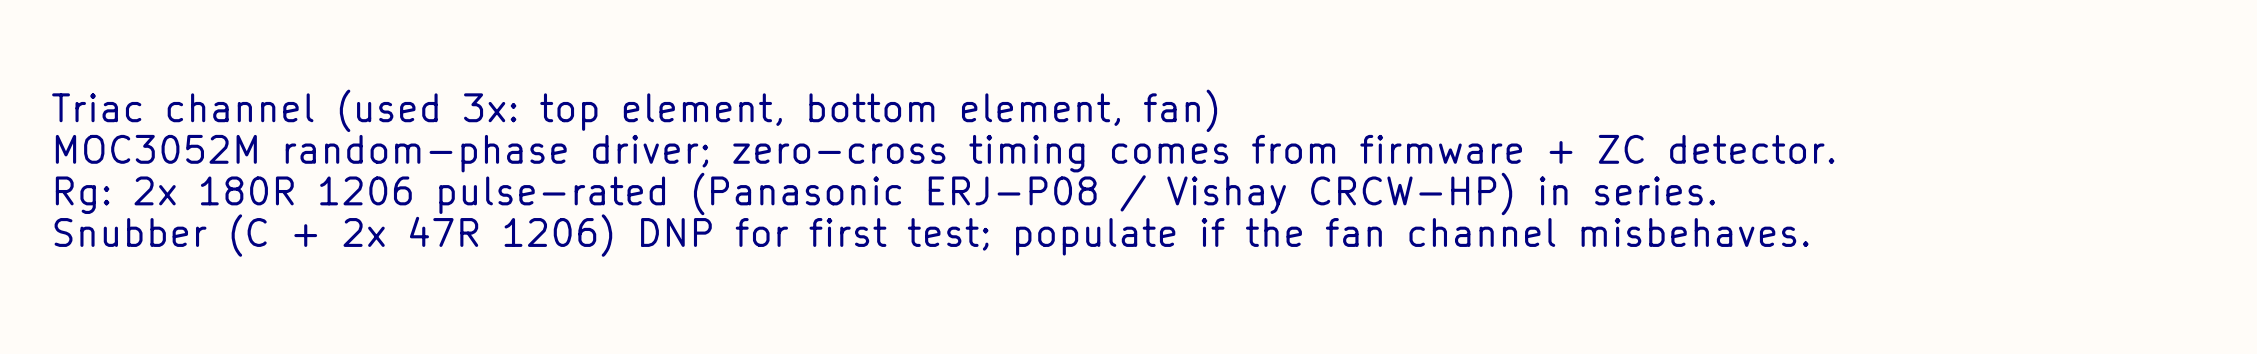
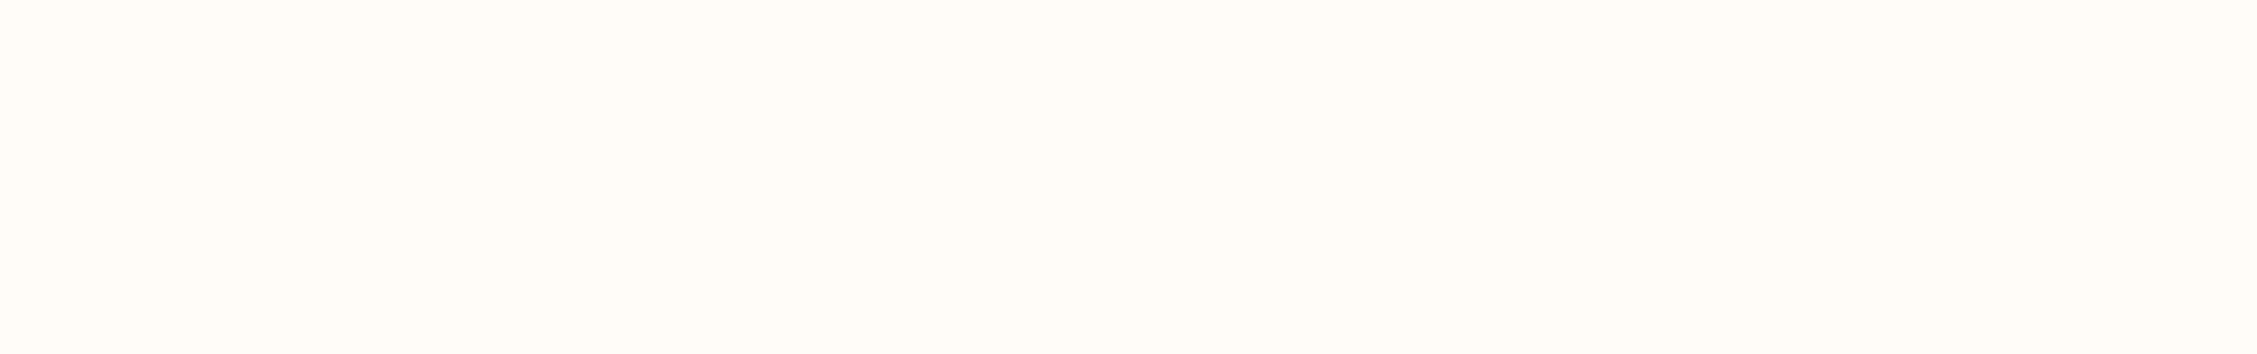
text: Triac channel (used 3x: top element, bottom element, fan) (634, 110) -> none
text: MOC3052M random-phase driver; zero-cross timing comes from firmware + ZC detector. (945, 153) -> none
text: Rg: 2x 180R 1206 pulse-rated (Panasonic ERJ-P08 / Vishay CRCW-HP) in series. (885, 193) -> none
text: Snubber (C + 2x 47R 1206) DNP for first test; populate if the fan channel misbehaves. (931, 235) -> none

